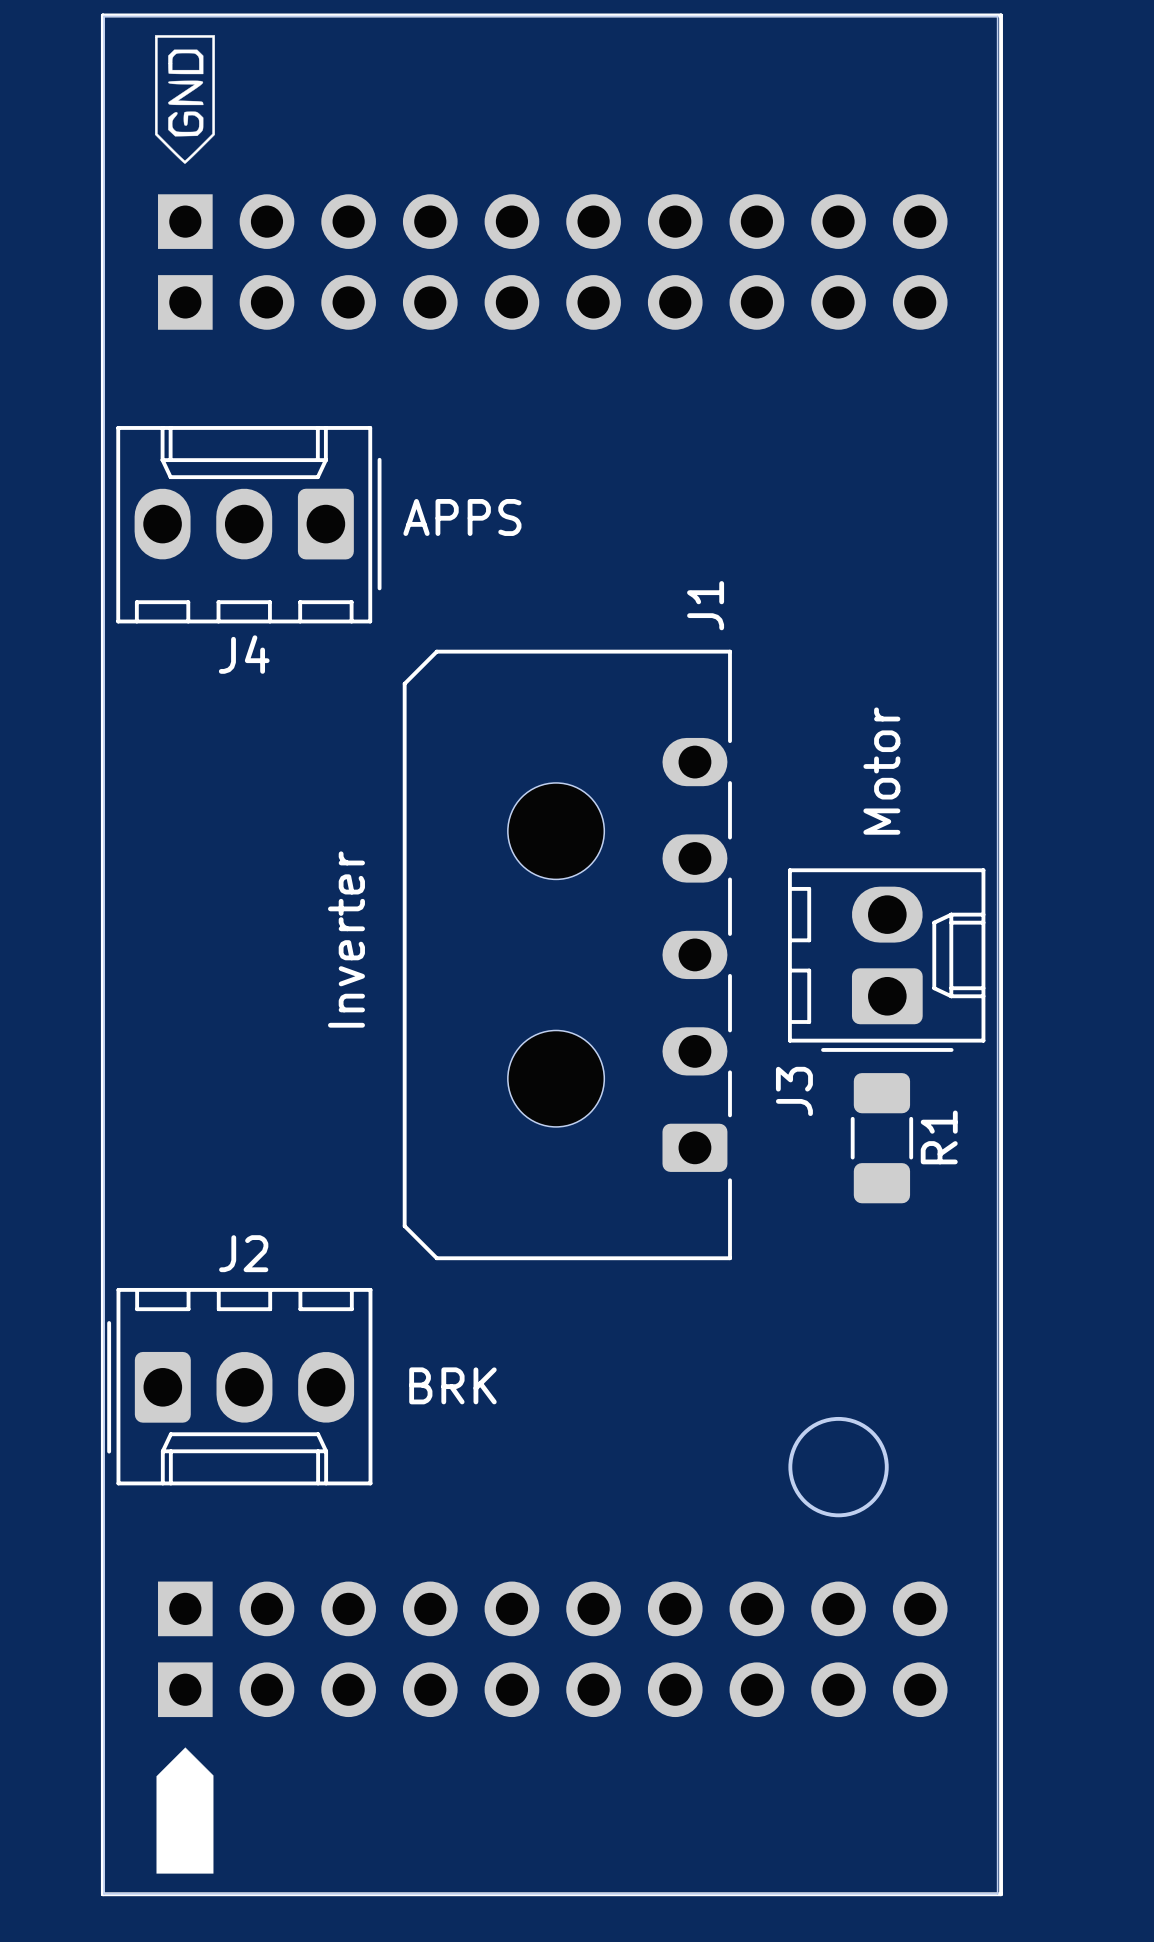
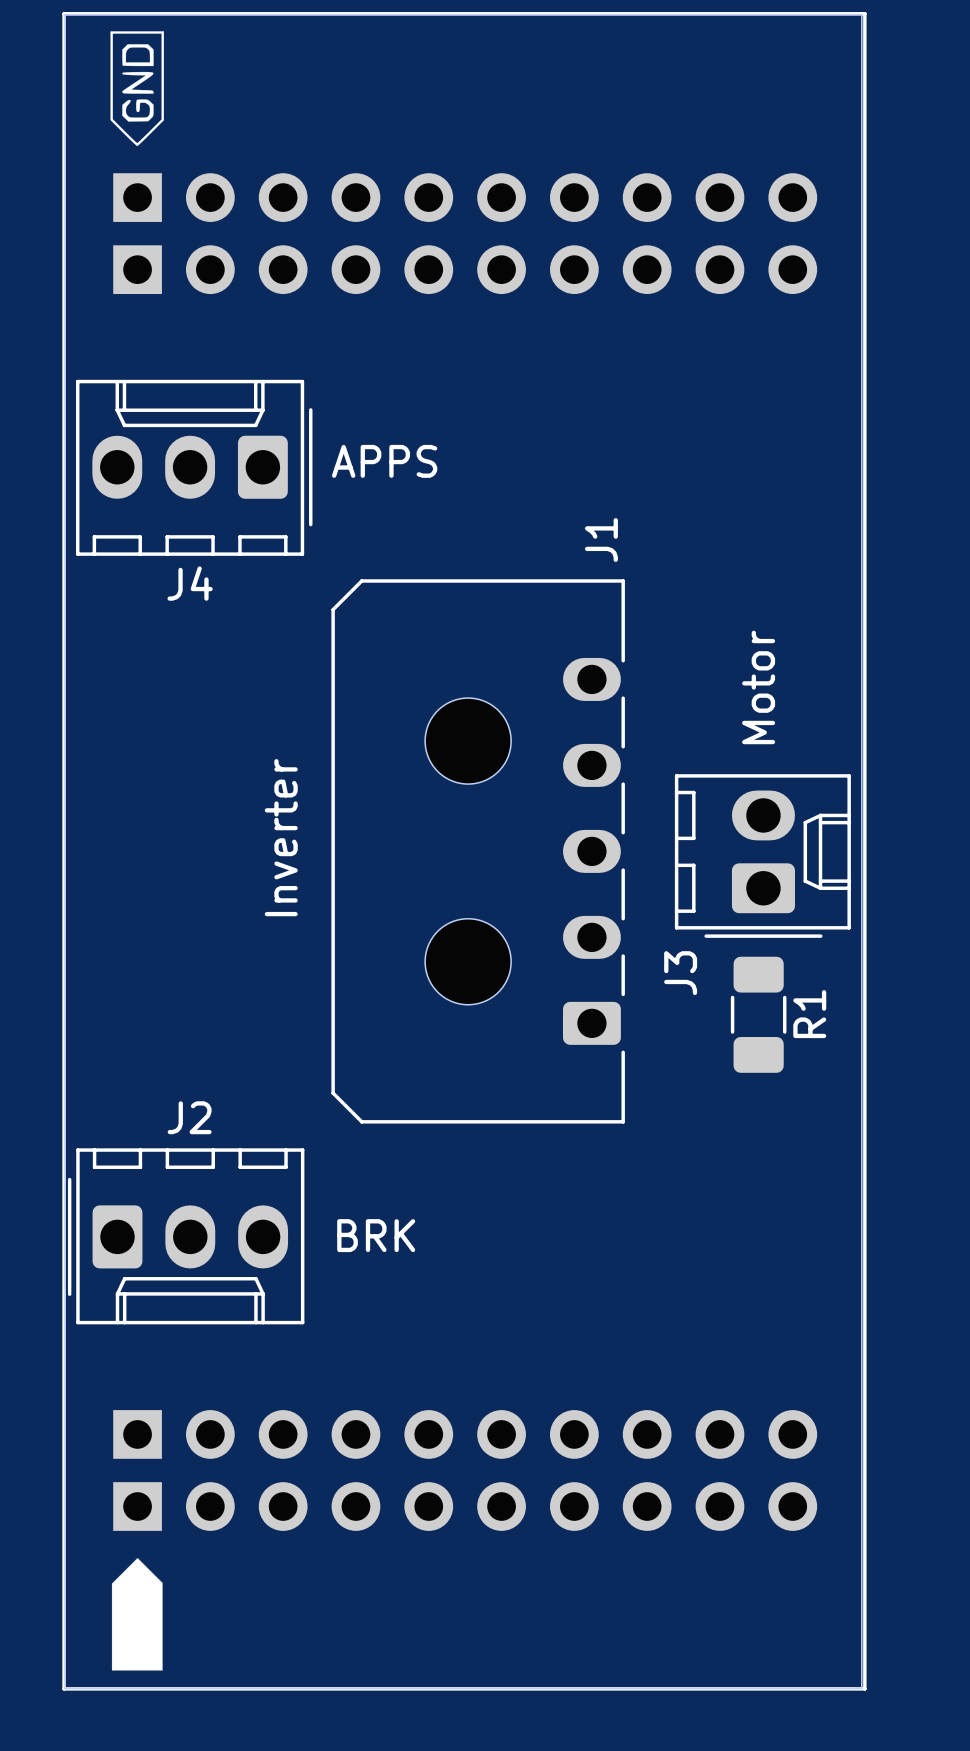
round board edge: [788, 1416, 889, 1518] -> none

